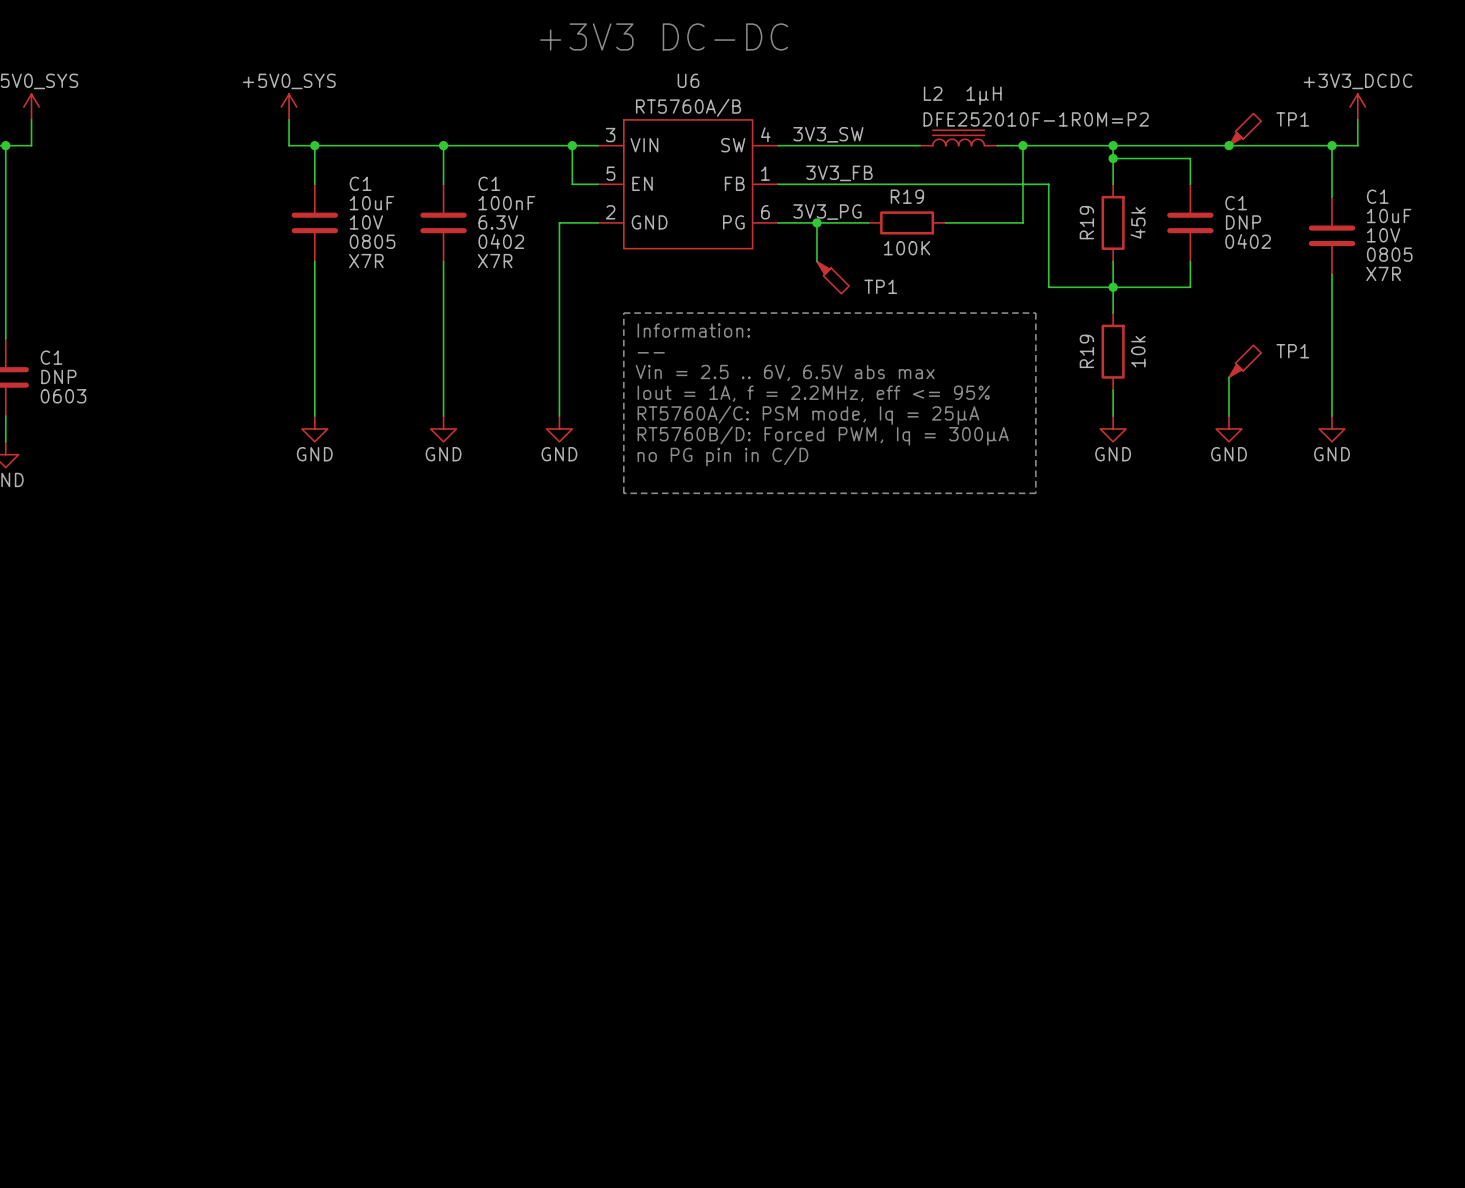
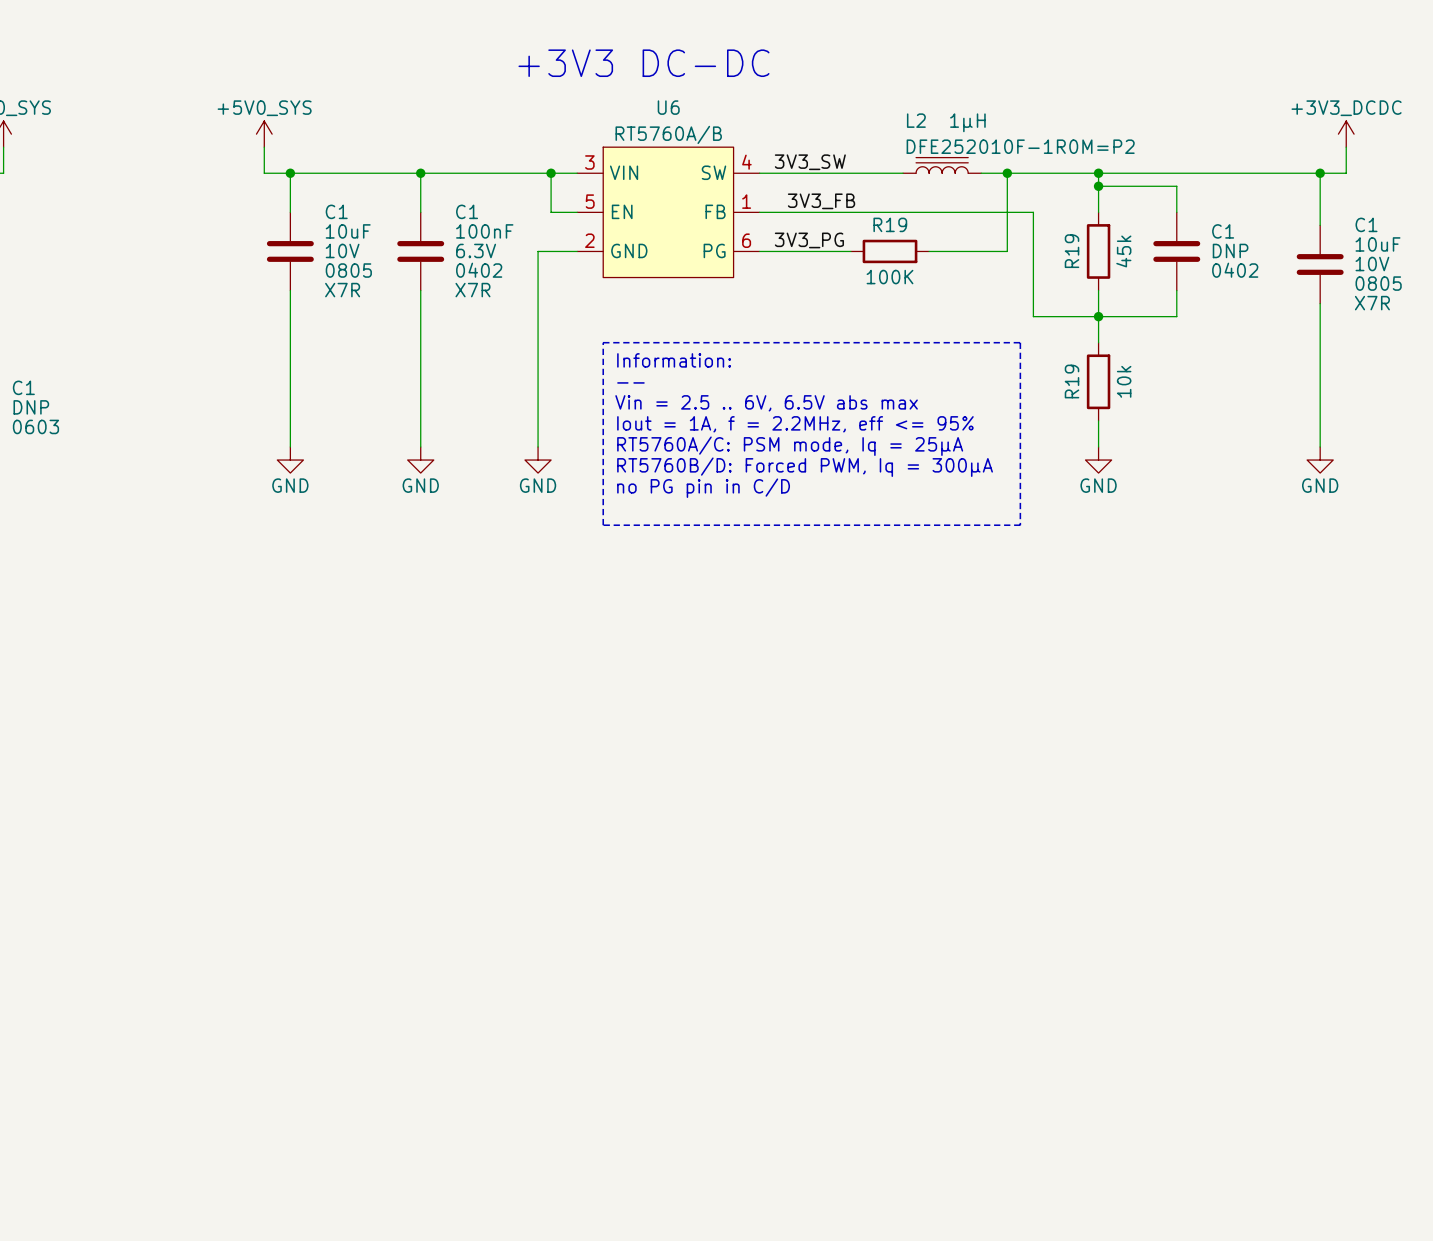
TP1: (1245, 129) -> none
junction: (1229, 145) -> none
wire: (816, 222) (816, 261) -> none
junction: (816, 222) -> none
TP1: (833, 277) -> none
TP1: (1245, 361) -> none
wire: (1229, 377) (1229, 416) -> none
power symbol: GND (1229, 428) -> none

